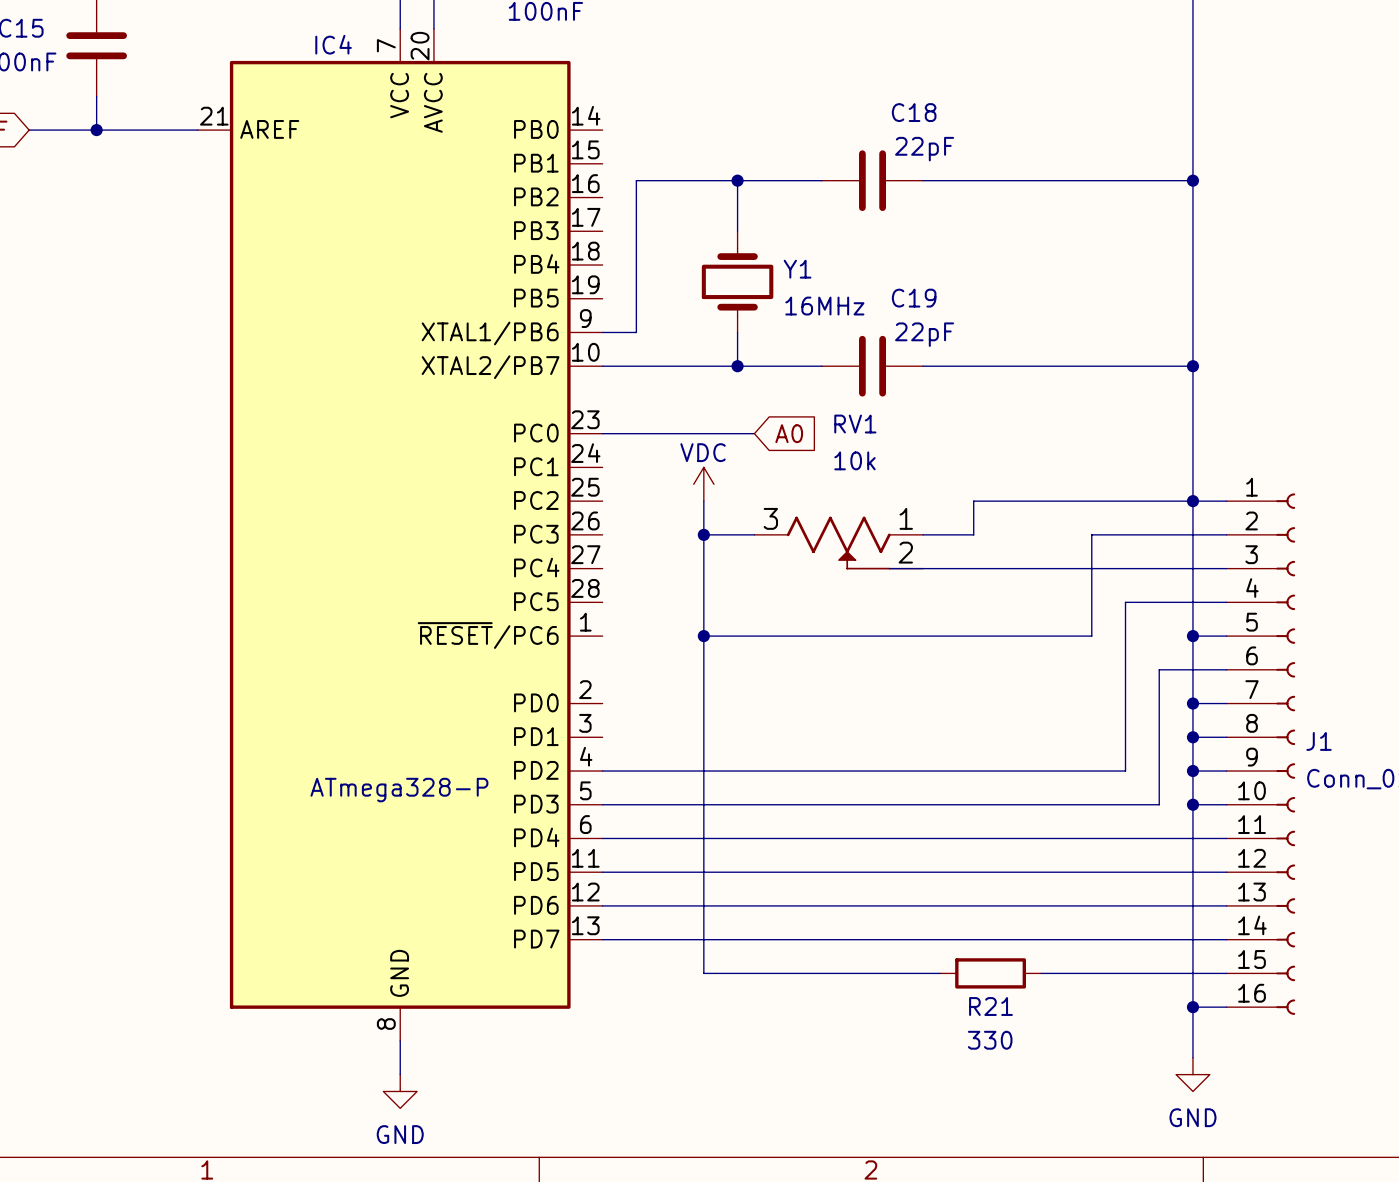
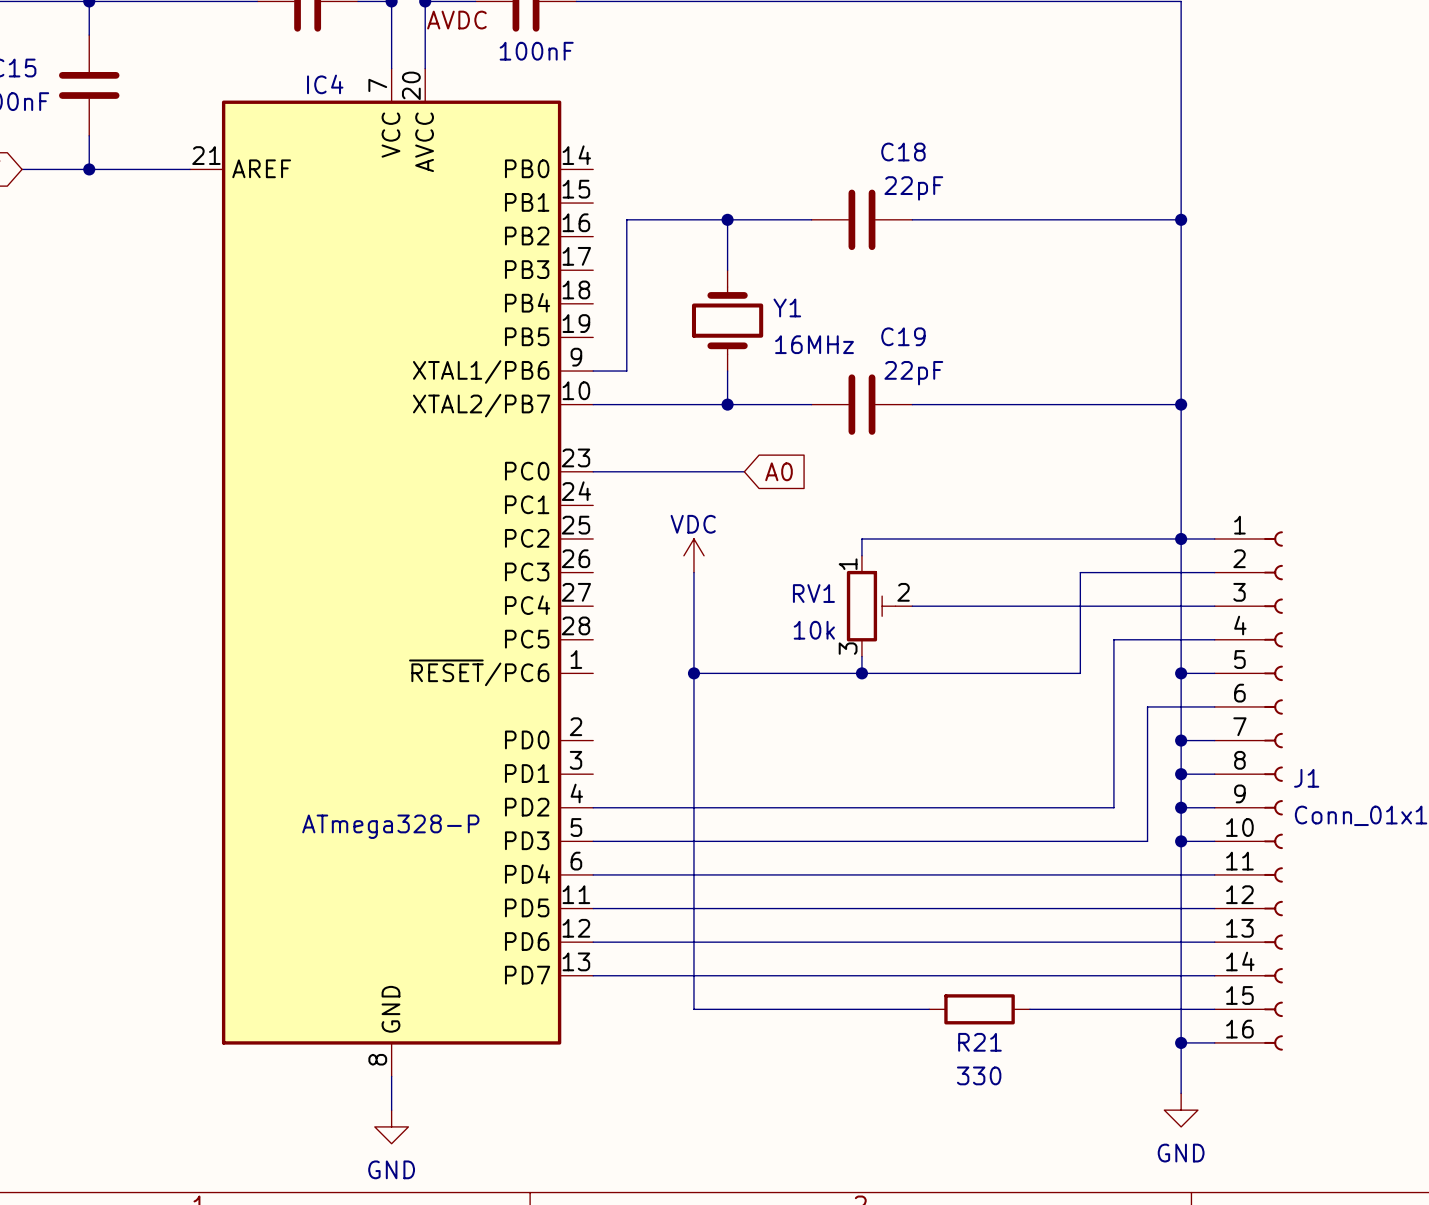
RV1 name position: RV1 (855, 424) -> RV1 (813, 593)
RV1 value position: 10k (854, 460) -> 10k (814, 630)
power symbol position: VDC (703, 484) -> VDC (693, 555)
wire: (703, 501) (703, 534) (754, 534) -> none
wire: (973, 501) (973, 534) (923, 534) -> (962, 538) (861, 538) (861, 555)
RV1 symbol: [754, 516, 924, 570] -> [846, 555, 913, 657]
junction: (703, 534) -> none
wire: none -> (861, 656) (861, 673)
junction: none -> (861, 673)

